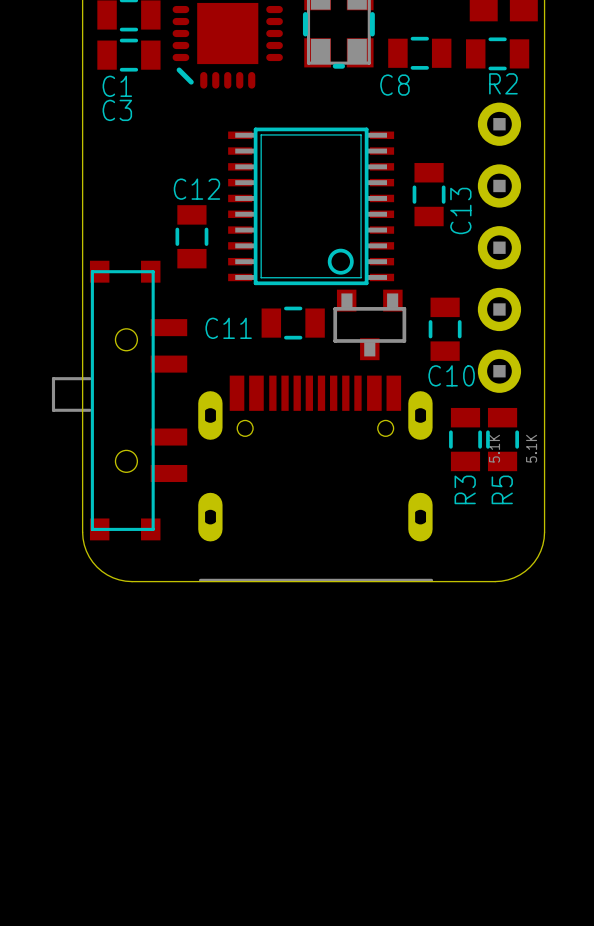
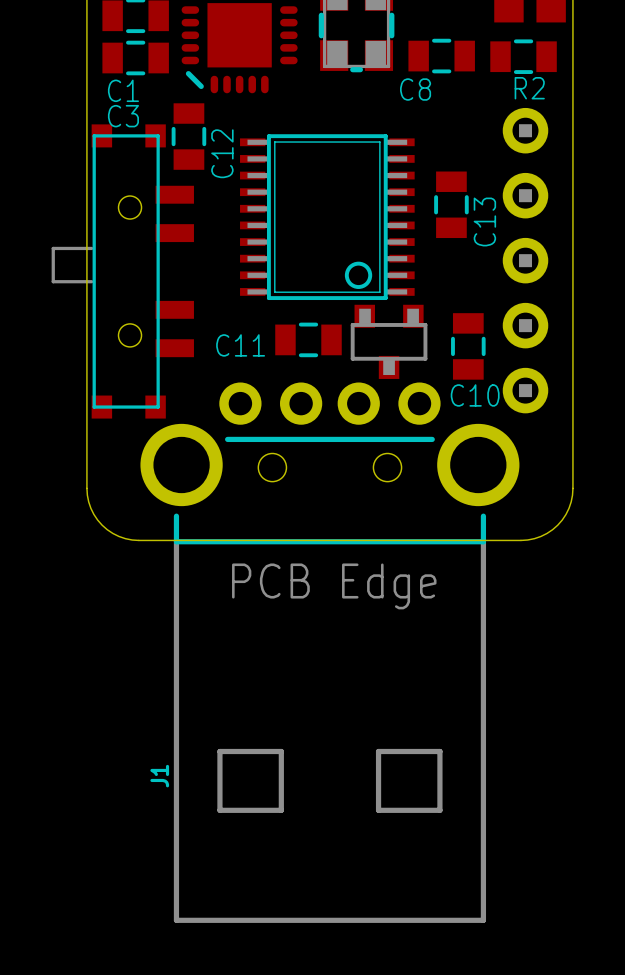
C12 name rotation: 0° (196, 189) -> 90° counterclockwise (222, 153)
C12 position: (191, 236) -> (188, 136)
part position: (119, 400) -> (122, 271)
R3: 5.1K (465, 439) -> none
R5: 5.1K (502, 439) -> none
board edge: (82, 464) (82, 532) (86, 551) (92, 562) (107, 574) (119, 579) (132, 581) (495, 581) (507, 579) (519, 574) (530, 567) (537, 556) (542, 544) (544, 464) -> (86, 488) (90, 508) (102, 525) (119, 536) (138, 540) (527, 539) (546, 533) (562, 520) (571, 501) (572, 488)
part: (315, 478) -> none
J1: none -> (329, 652)

